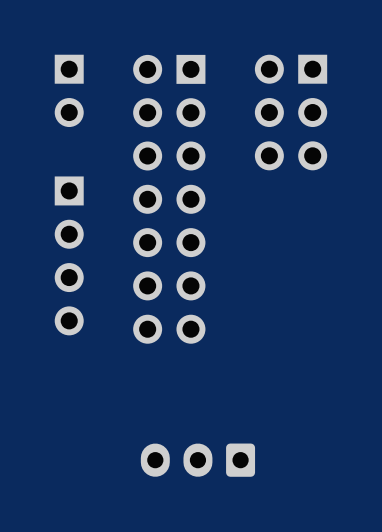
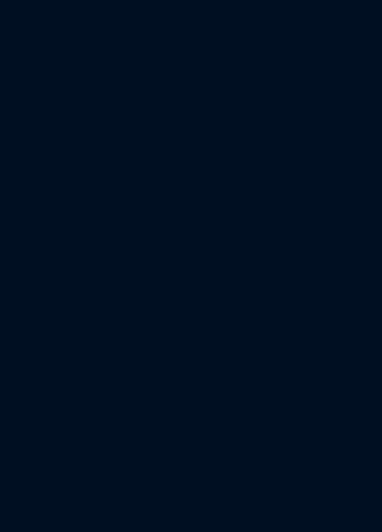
part: (69, 90) -> none
part: (291, 112) -> none
part: (169, 199) -> none
part: (69, 255) -> none
part: (197, 460) -> none

